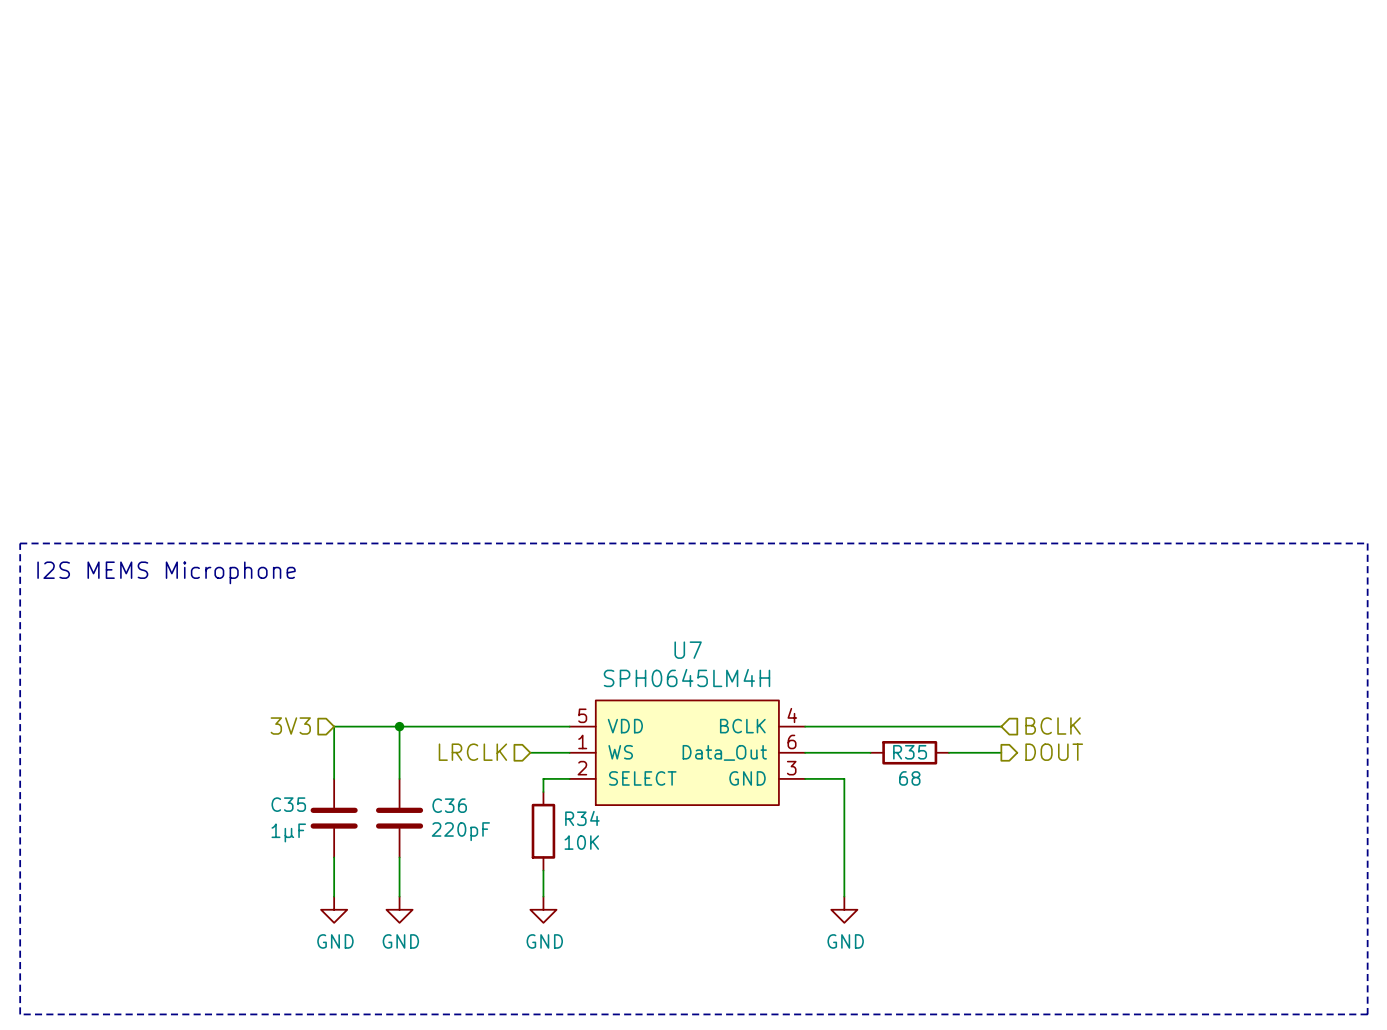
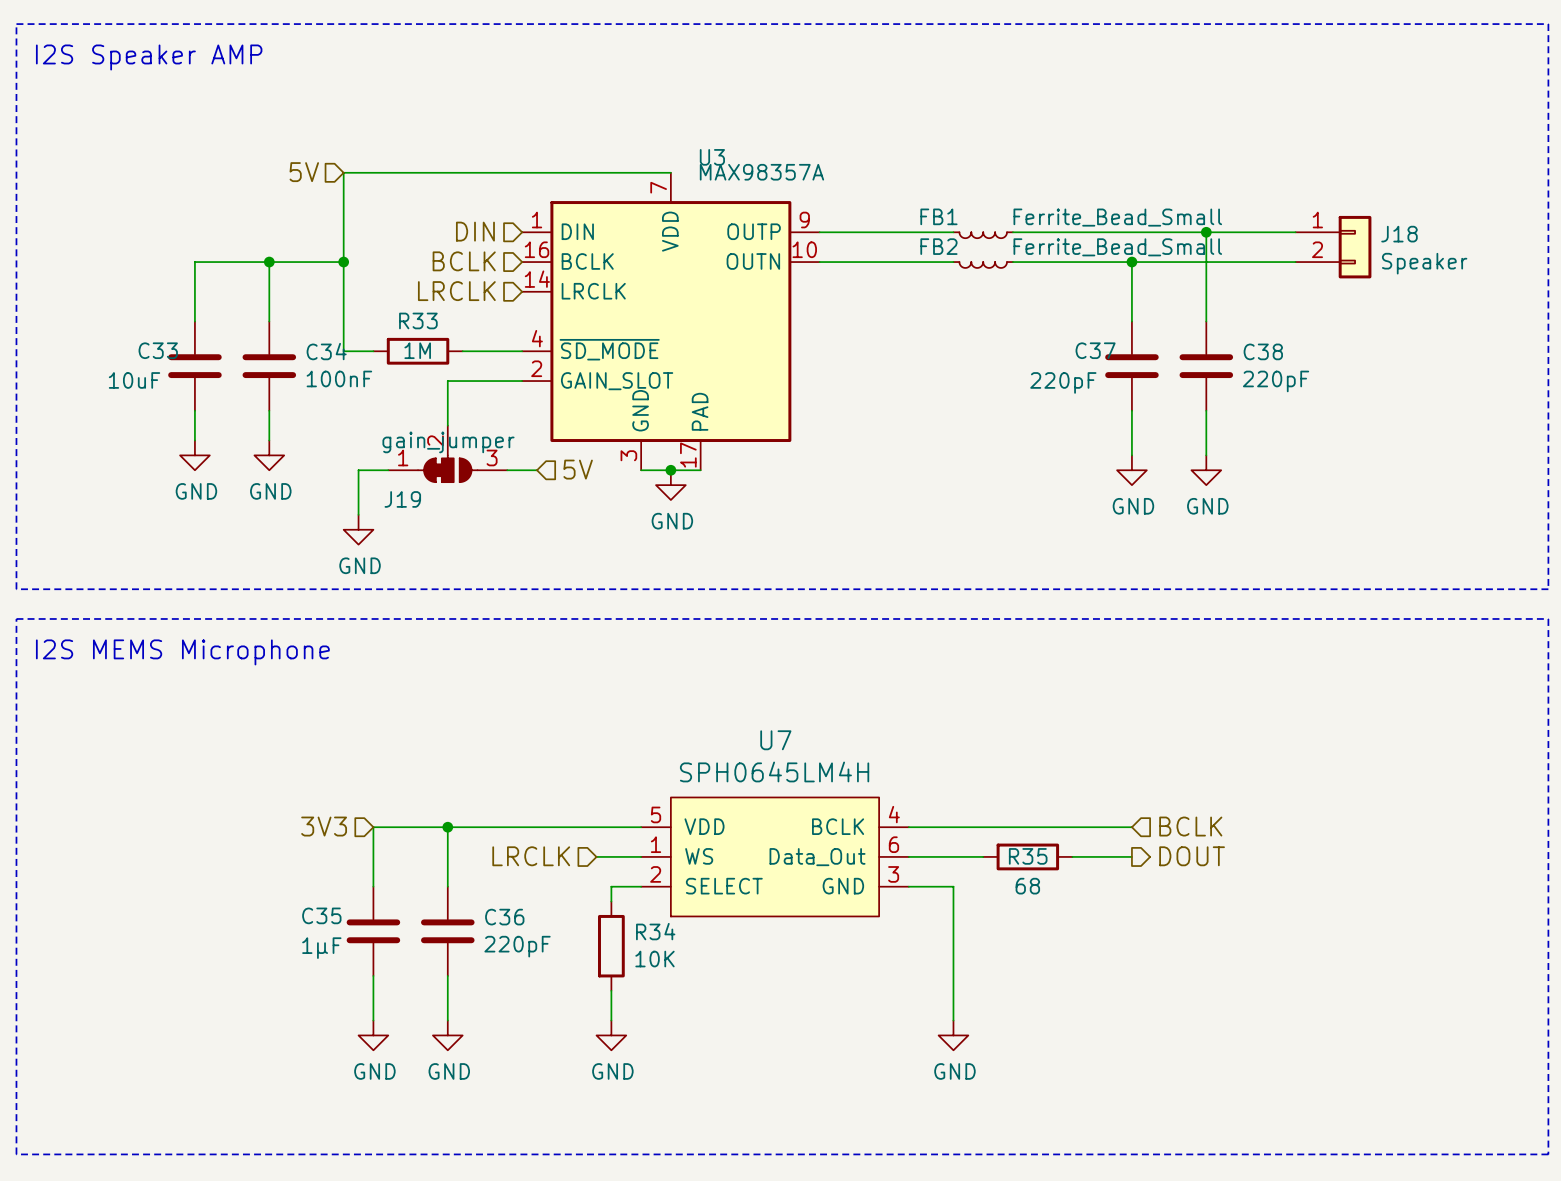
line: none -> (16, 24) (16, 589) (1548, 589) (1548, 24) (16, 24)
text: none -> I2S Speaker AMP (149, 57)
hierarchical label: none -> 5V (304, 172)
wire: none -> (670, 172) (343, 172) (343, 351) (373, 351)
hierarchical label: none -> DIN (475, 231)
wire: none -> (819, 232) (953, 232)
wire: none -> (1012, 232) (1295, 232)
wire: none -> (1206, 232) (1206, 321)
junction: none -> (1206, 232)
FB1: none -> Ferrite_Bead_Small (983, 235)
J18: none -> Speaker (1333, 247)
hierarchical label: none -> BCLK (464, 261)
wire: none -> (269, 262) (269, 321)
junction: none -> (269, 262)
wire: none -> (343, 262) (194, 262) (194, 321)
junction: none -> (343, 262)
wire: none -> (819, 262) (953, 262)
wire: none -> (1012, 262) (1295, 262)
wire: none -> (1131, 262) (1131, 321)
junction: none -> (1131, 262)
FB2: none -> Ferrite_Bead_Small (983, 265)
hierarchical label: none -> LRCLK (456, 291)
U3: none -> MAX98357A (670, 321)
R33: none -> 1M (418, 351)
wire: none -> (462, 351) (522, 351)
C33: none -> 10uF (194, 366)
C34: none -> 100nF (269, 366)
C37: none -> 220pF (1131, 366)
C38: none -> 220pF (1206, 366)
wire: none -> (522, 381) (447, 381) (447, 425)
wire: none -> (194, 410) (194, 440)
wire: none -> (269, 410) (269, 440)
wire: none -> (1131, 410) (1131, 455)
wire: none -> (1206, 410) (1206, 455)
J19: none -> gain_jumper (447, 453)
power symbol: none -> GND (194, 455)
power symbol: none -> GND (269, 455)
wire: none -> (388, 470) (358, 470) (358, 514)
wire: none -> (507, 470) (537, 470)
hierarchical label: none -> 5V (578, 469)
wire: none -> (641, 470) (700, 470)
junction: none -> (670, 470)
power symbol: none -> GND (1131, 470)
power symbol: none -> GND (1206, 470)
power symbol: none -> GND (670, 485)
power symbol: none -> GND (358, 529)

